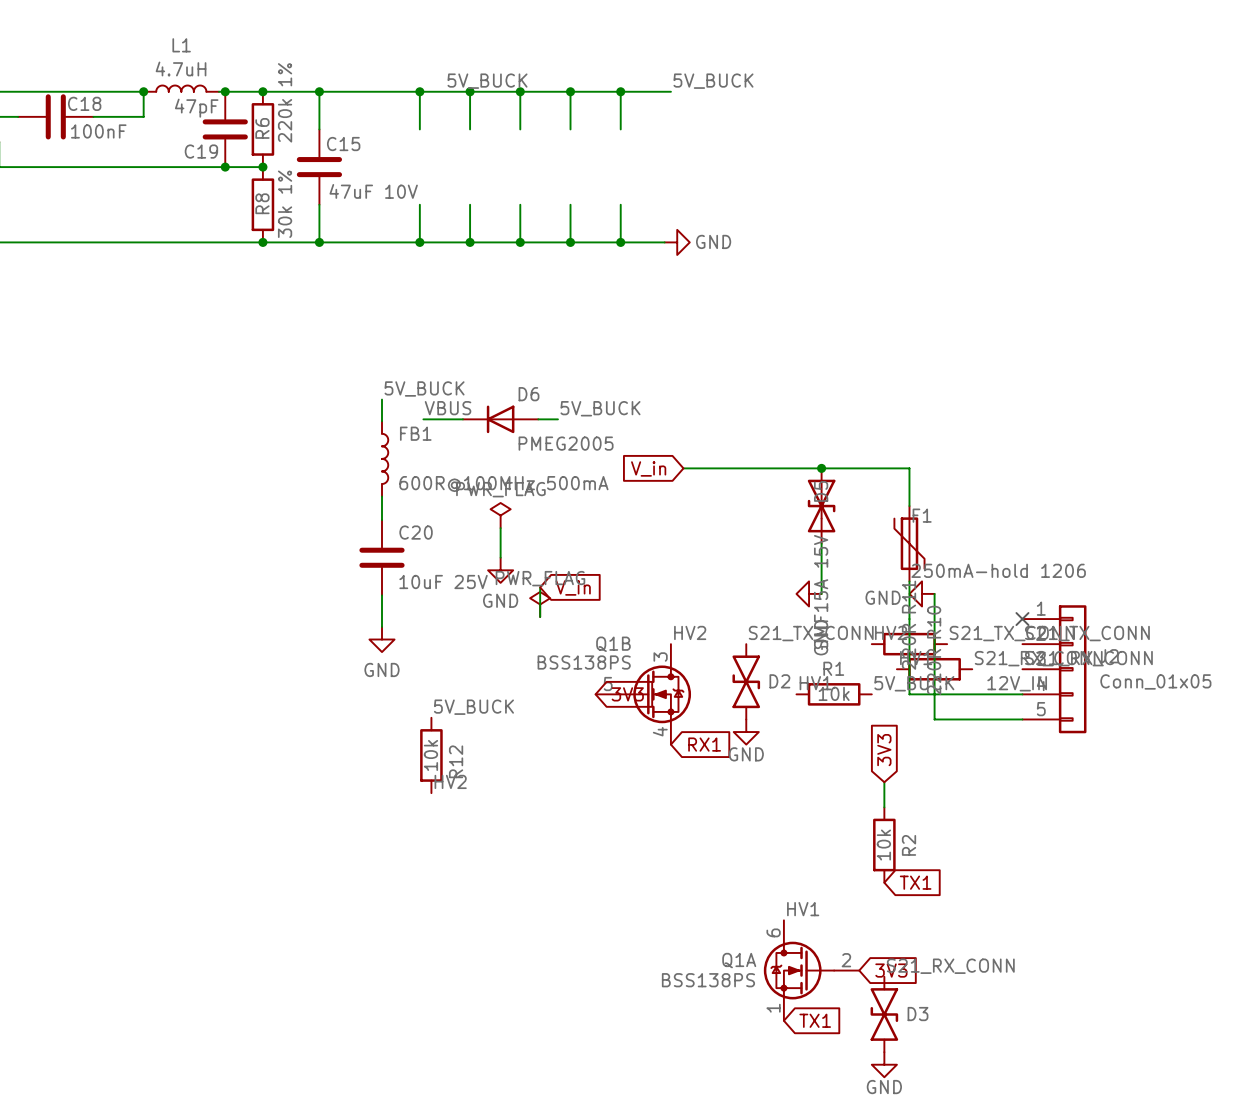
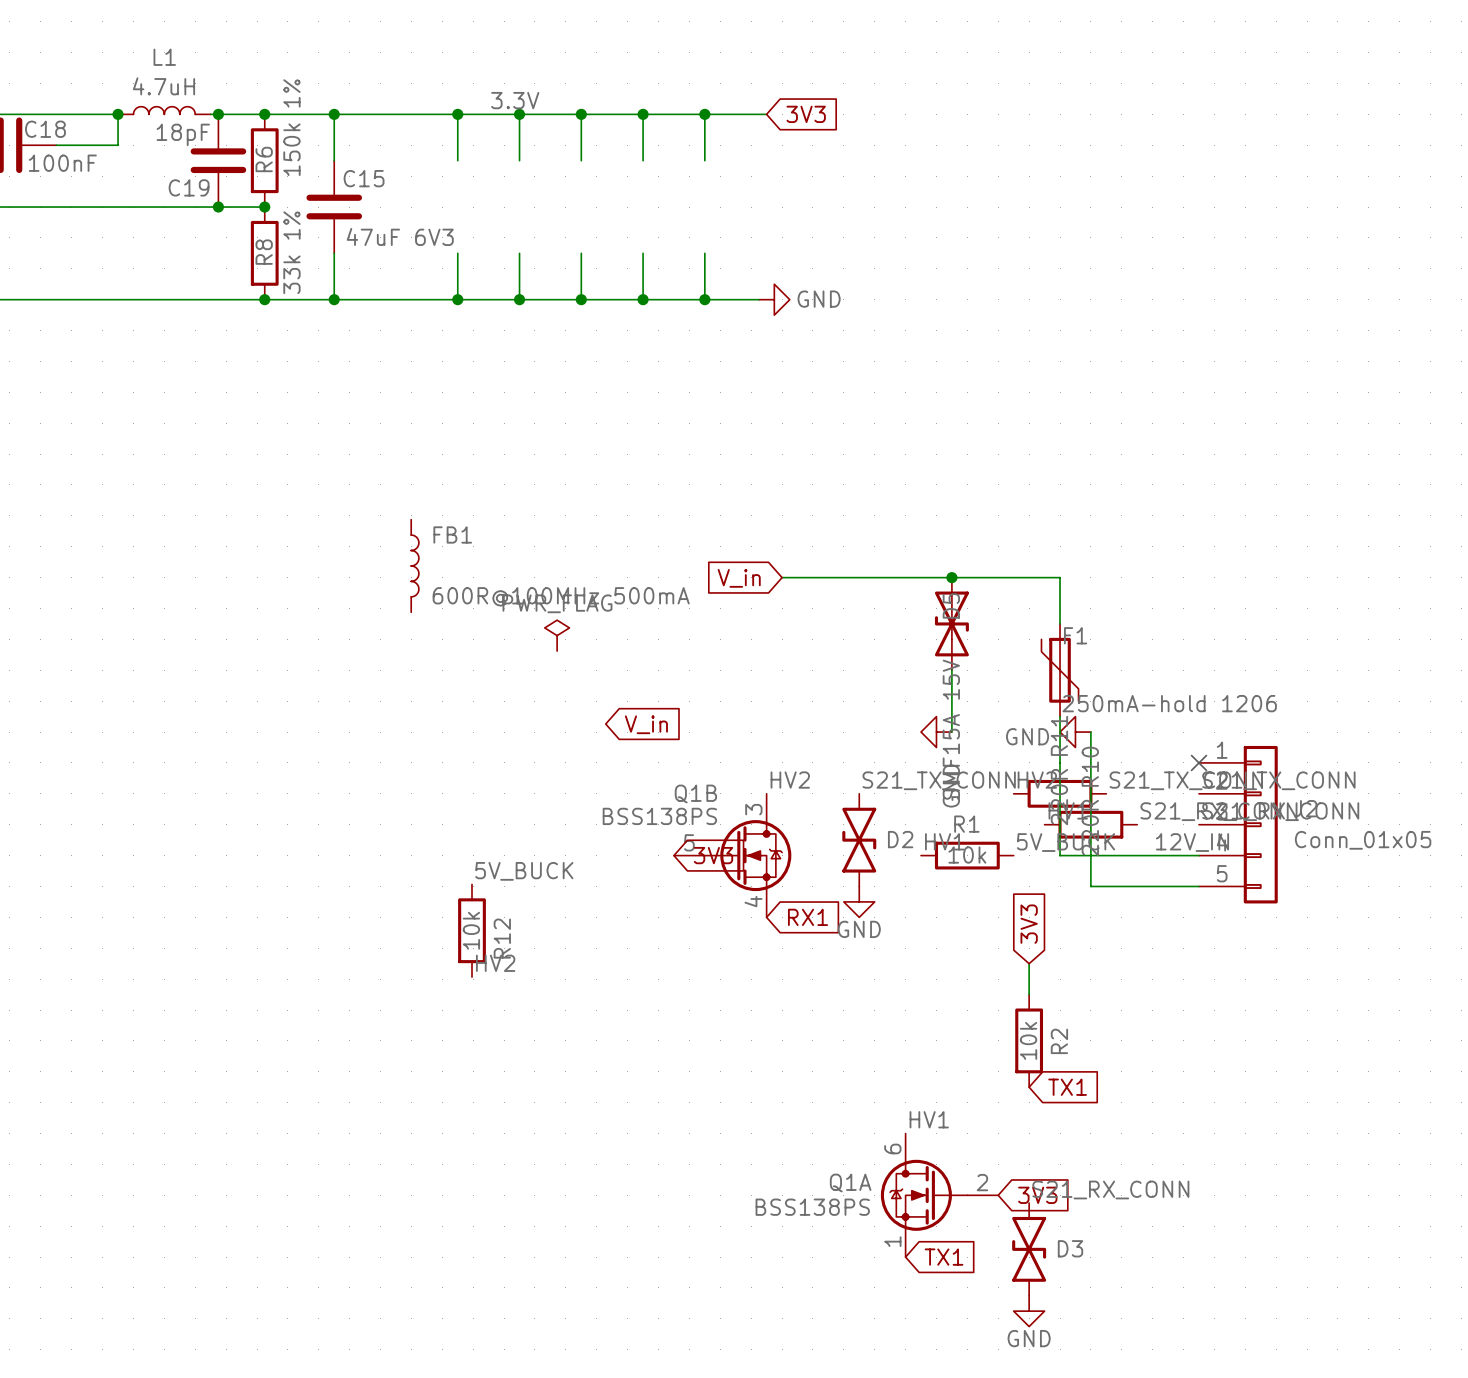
label: 5V_BUCK (487, 81) -> 3.3V (515, 100)
label: 5V_BUCK (713, 81) -> none
global label: none -> 3V3 (806, 114)
R6 value: 220k 1% (285, 102) -> 150k 1% (291, 127)
C19 value: 47pF (196, 108) -> 18pF (183, 134)
C15 value: 47uF 10V (373, 191) -> 47uF 6V3 (400, 236)
R8 value: 30k 1% (285, 204) -> 33k 1% (291, 252)
label: 5V_BUCK (424, 388) -> none
wire: (382, 399) (382, 421) -> none
label: VBUS (448, 408) -> none
label: 5V_BUCK (600, 408) -> none
wire: (423, 419) (462, 419) -> none
D6: PMEG2005 (500, 419) -> none
wire: (538, 419) (557, 419) -> none
wire: (382, 496) (382, 520) -> none
wire: (500, 528) (500, 557) -> none
C20: 10uF 25V (382, 557) -> none
power symbol: GND (500, 570) -> none
wire: (540, 587) (540, 617) -> none
wire: (382, 595) (382, 626) -> none
power symbol: PWR_FLAG (540, 604) -> none
power symbol: GND (382, 639) -> none

